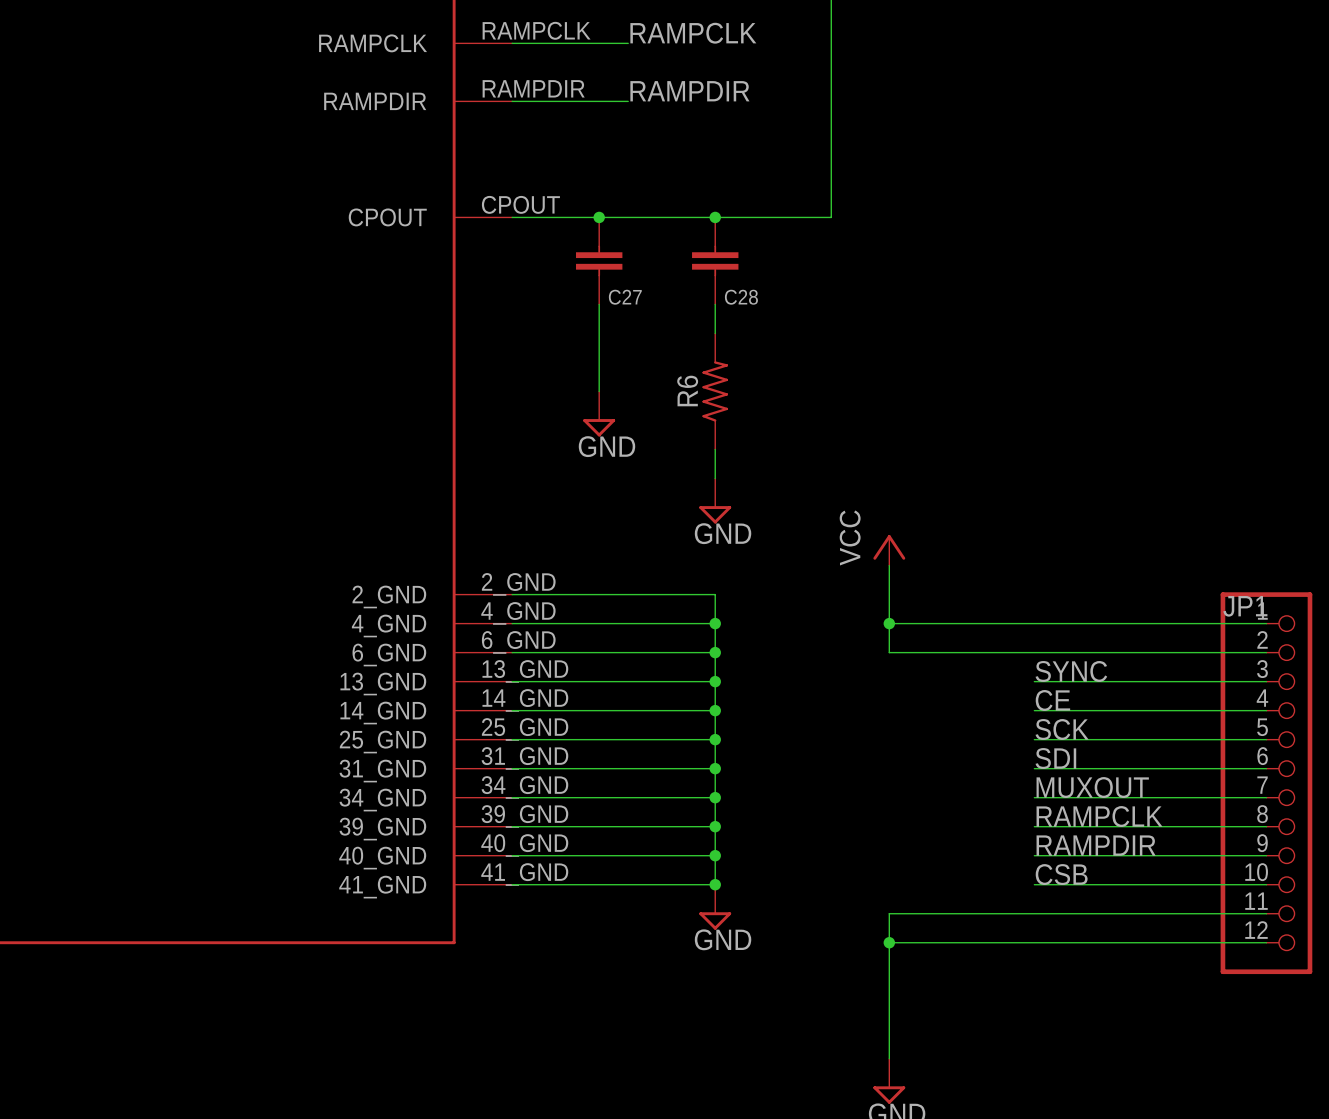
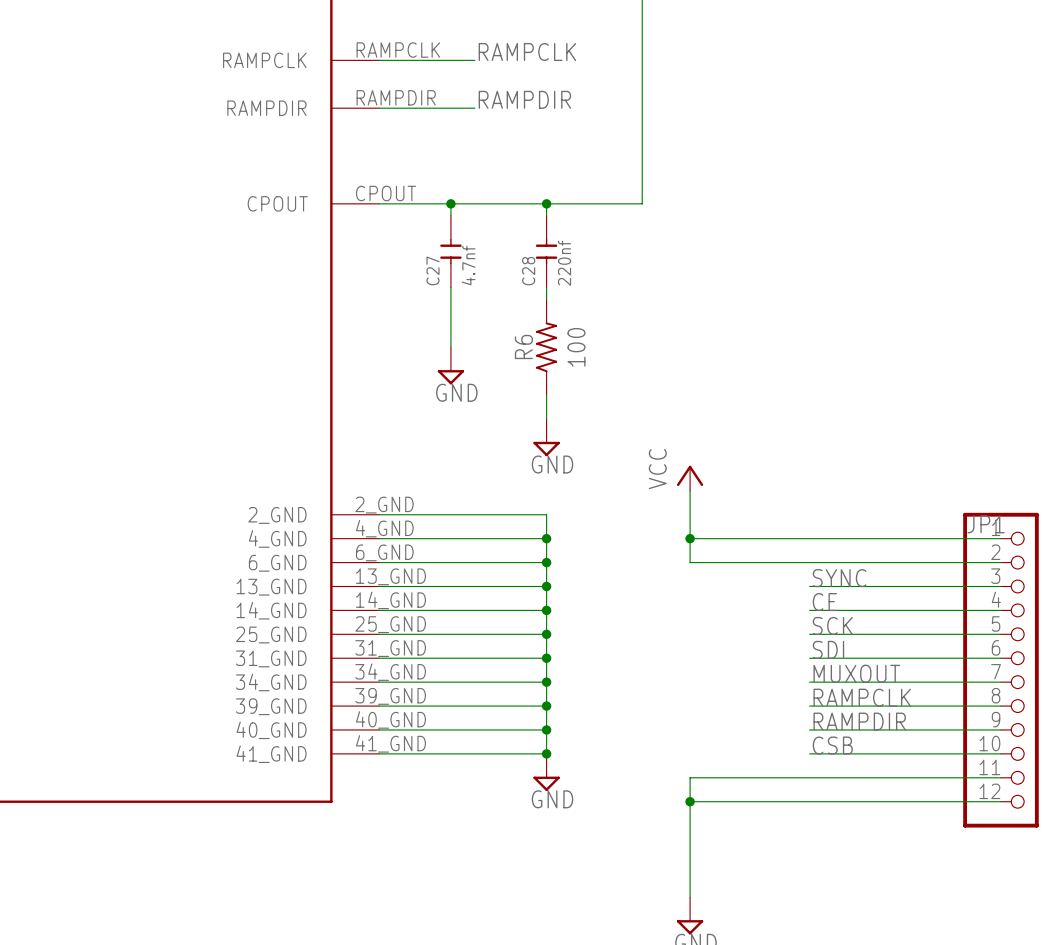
C27 symbol: [575, 217, 623, 305] -> [440, 215, 462, 288]
C28 symbol: [692, 217, 739, 305] -> [535, 215, 558, 288]
C28 value: none -> 220nf (564, 263)
C27 value: none -> 4.7nf (468, 265)
C27 name position: C27 (625, 297) -> C27 (433, 270)
C28 name position: C28 (741, 297) -> C28 (528, 271)
R6 value: none -> 100 (576, 347)

